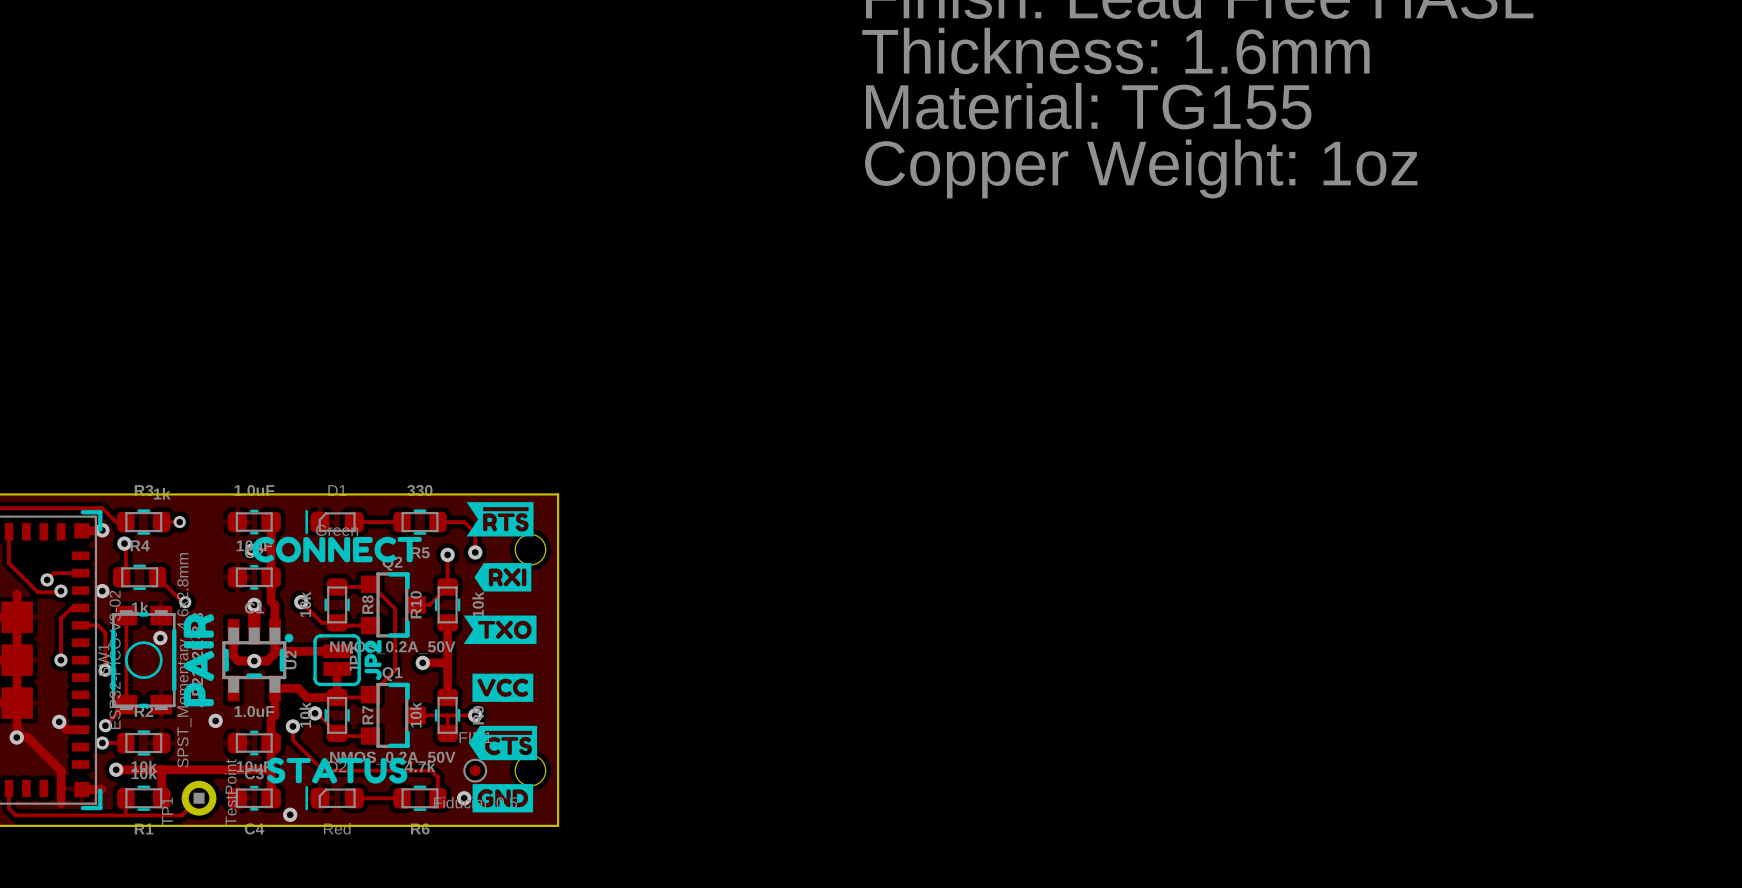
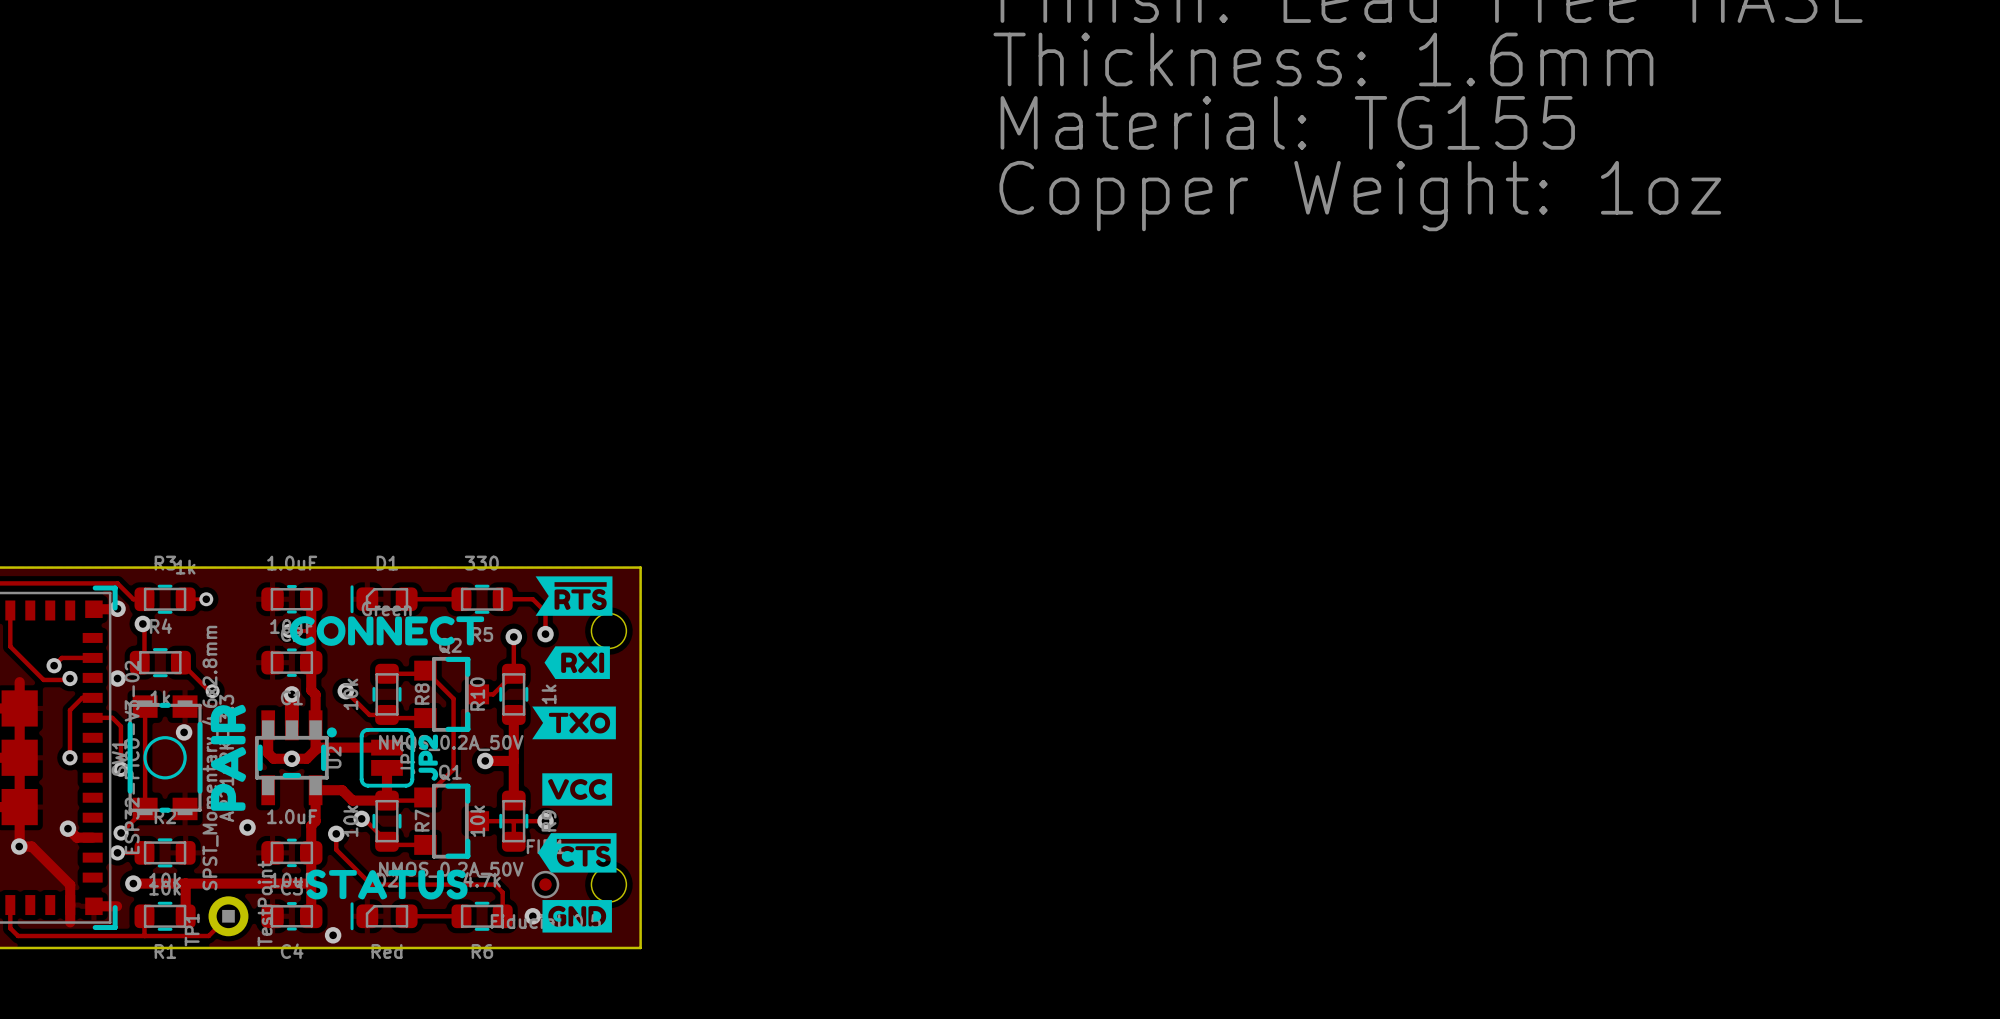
R10 value: 10k (478, 604) -> 1k (549, 694)

